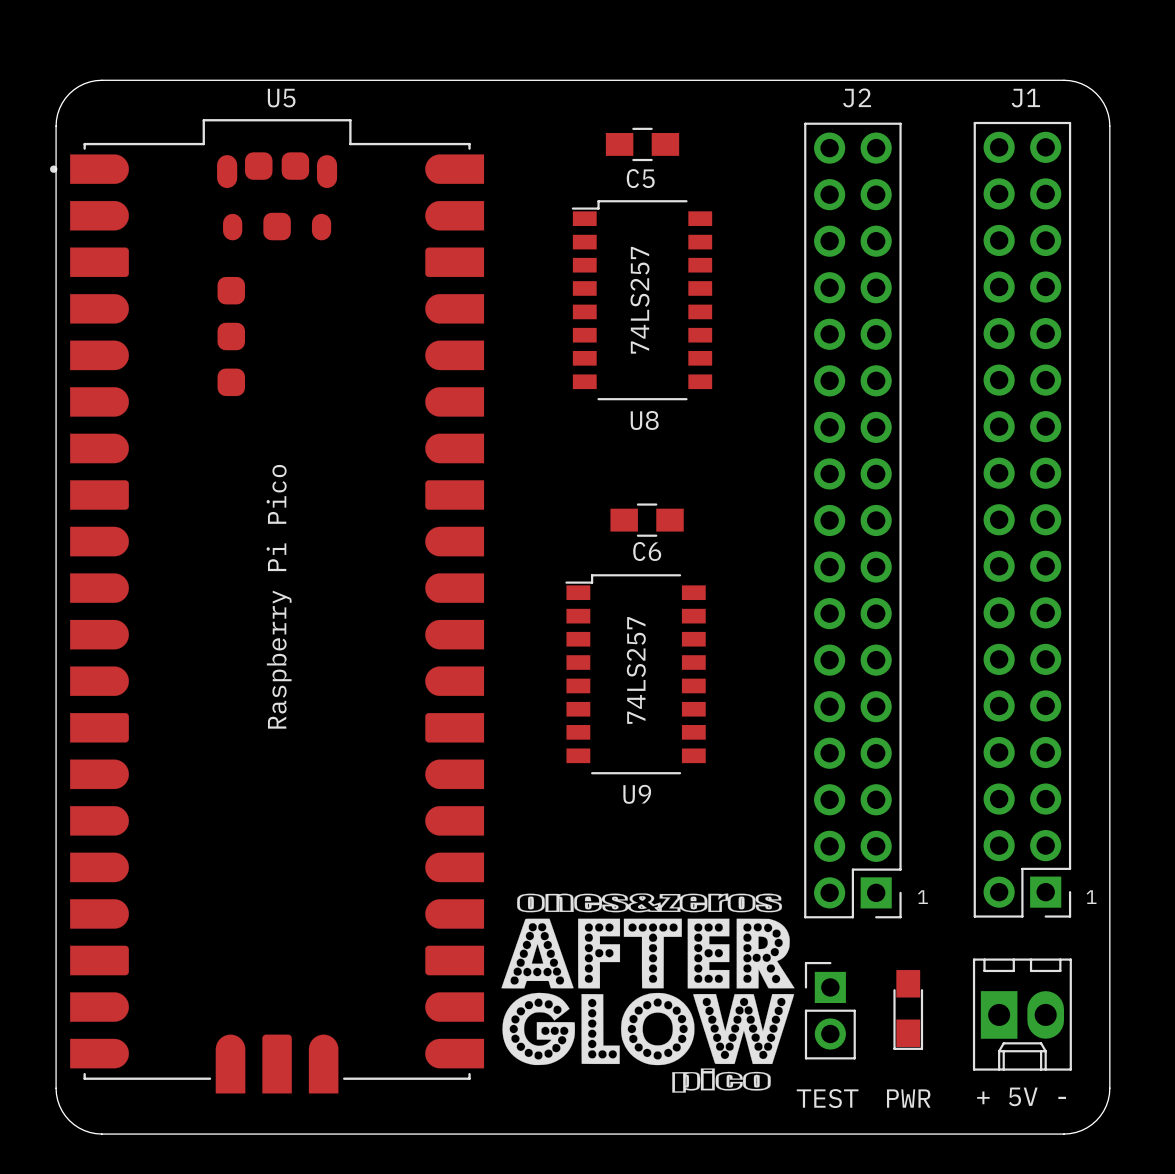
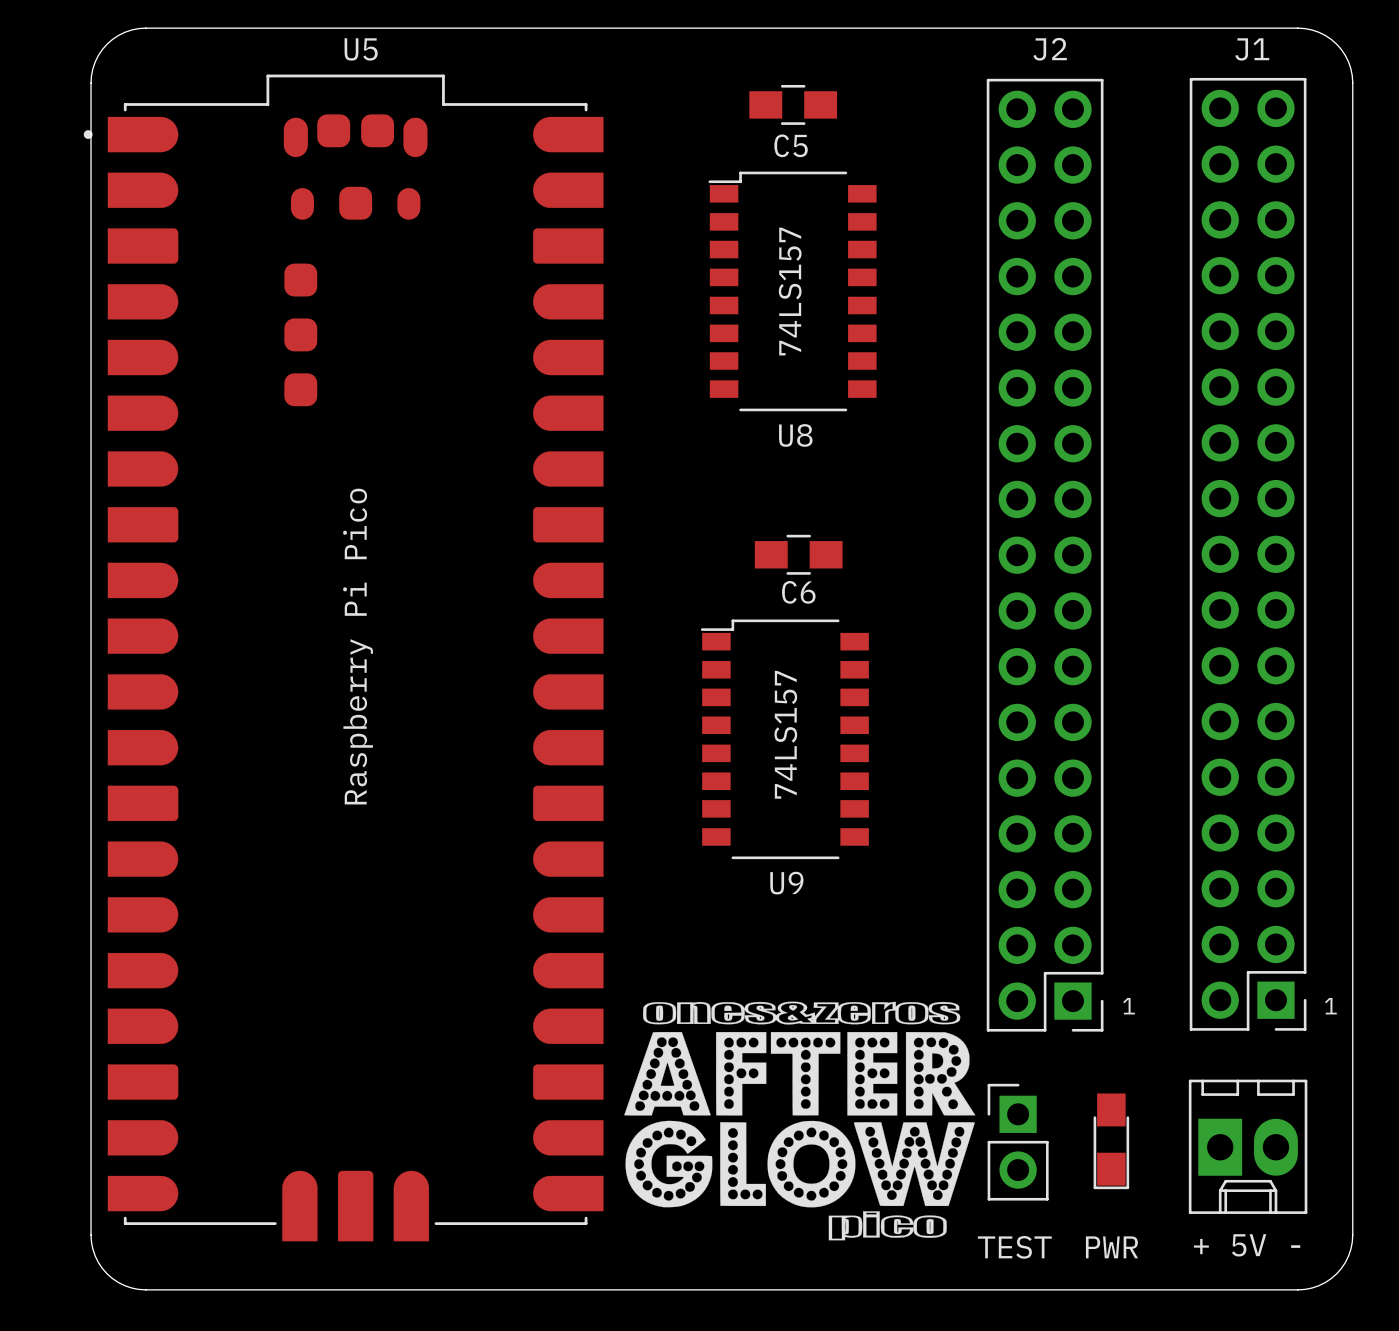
text: 74LS257 (639, 300) -> 74LS157 (790, 291)
text: 74LS257 (636, 670) -> 74LS157 (785, 734)

